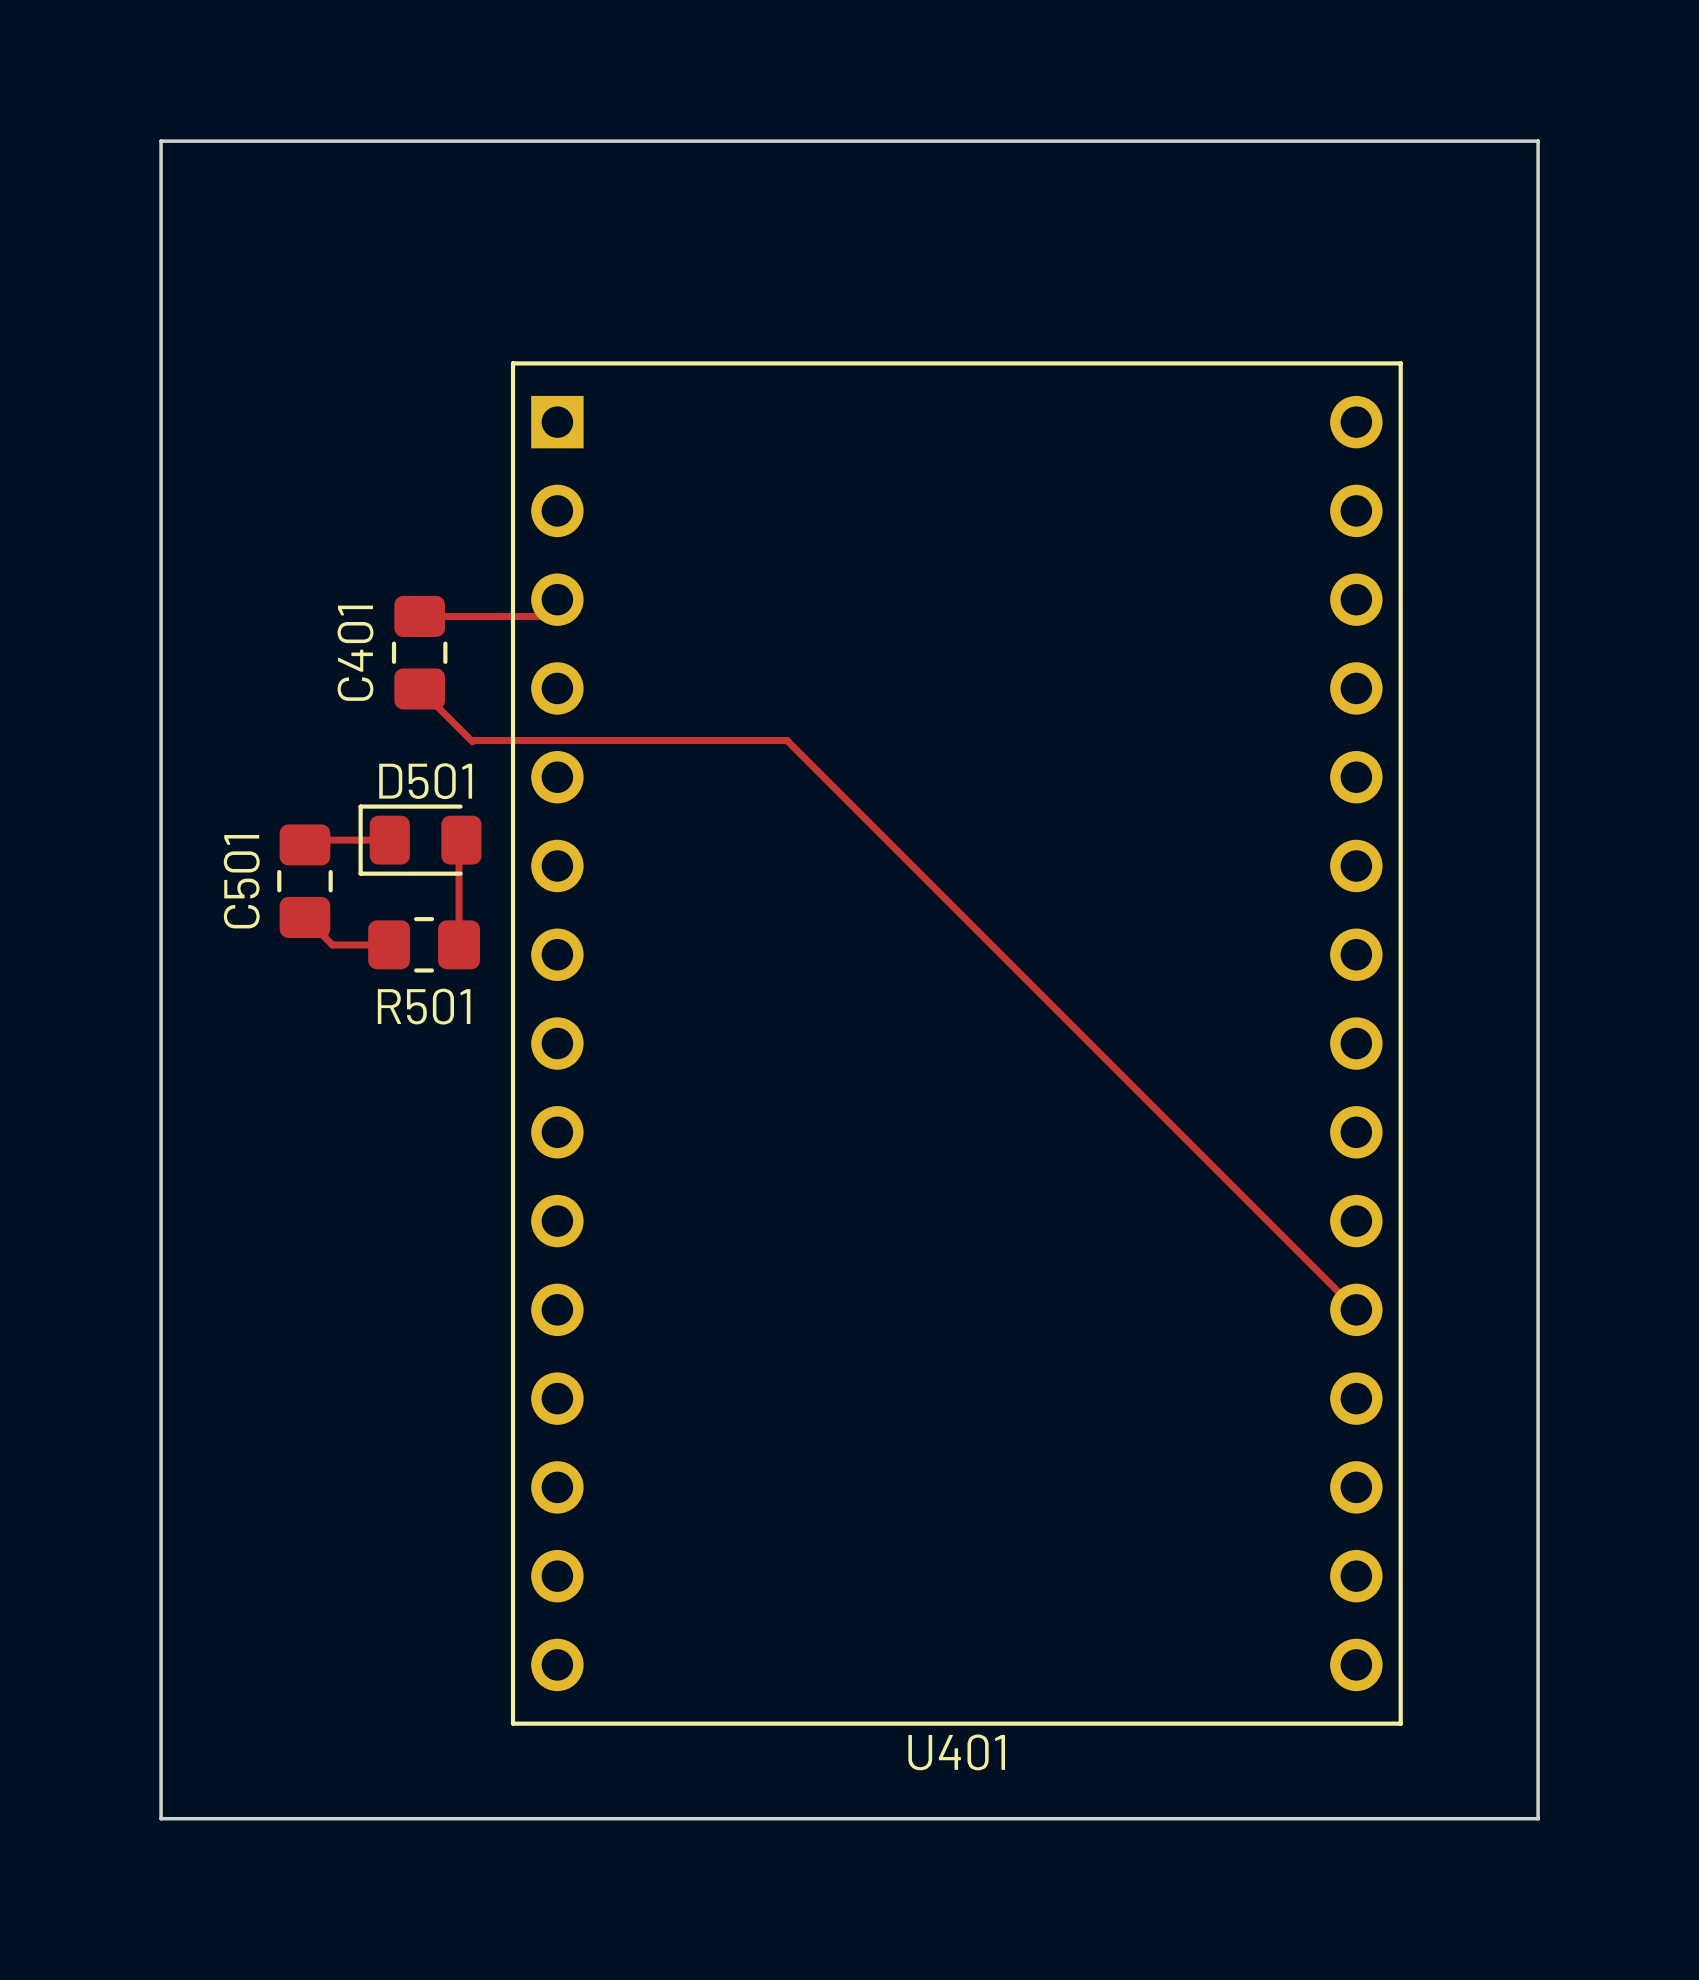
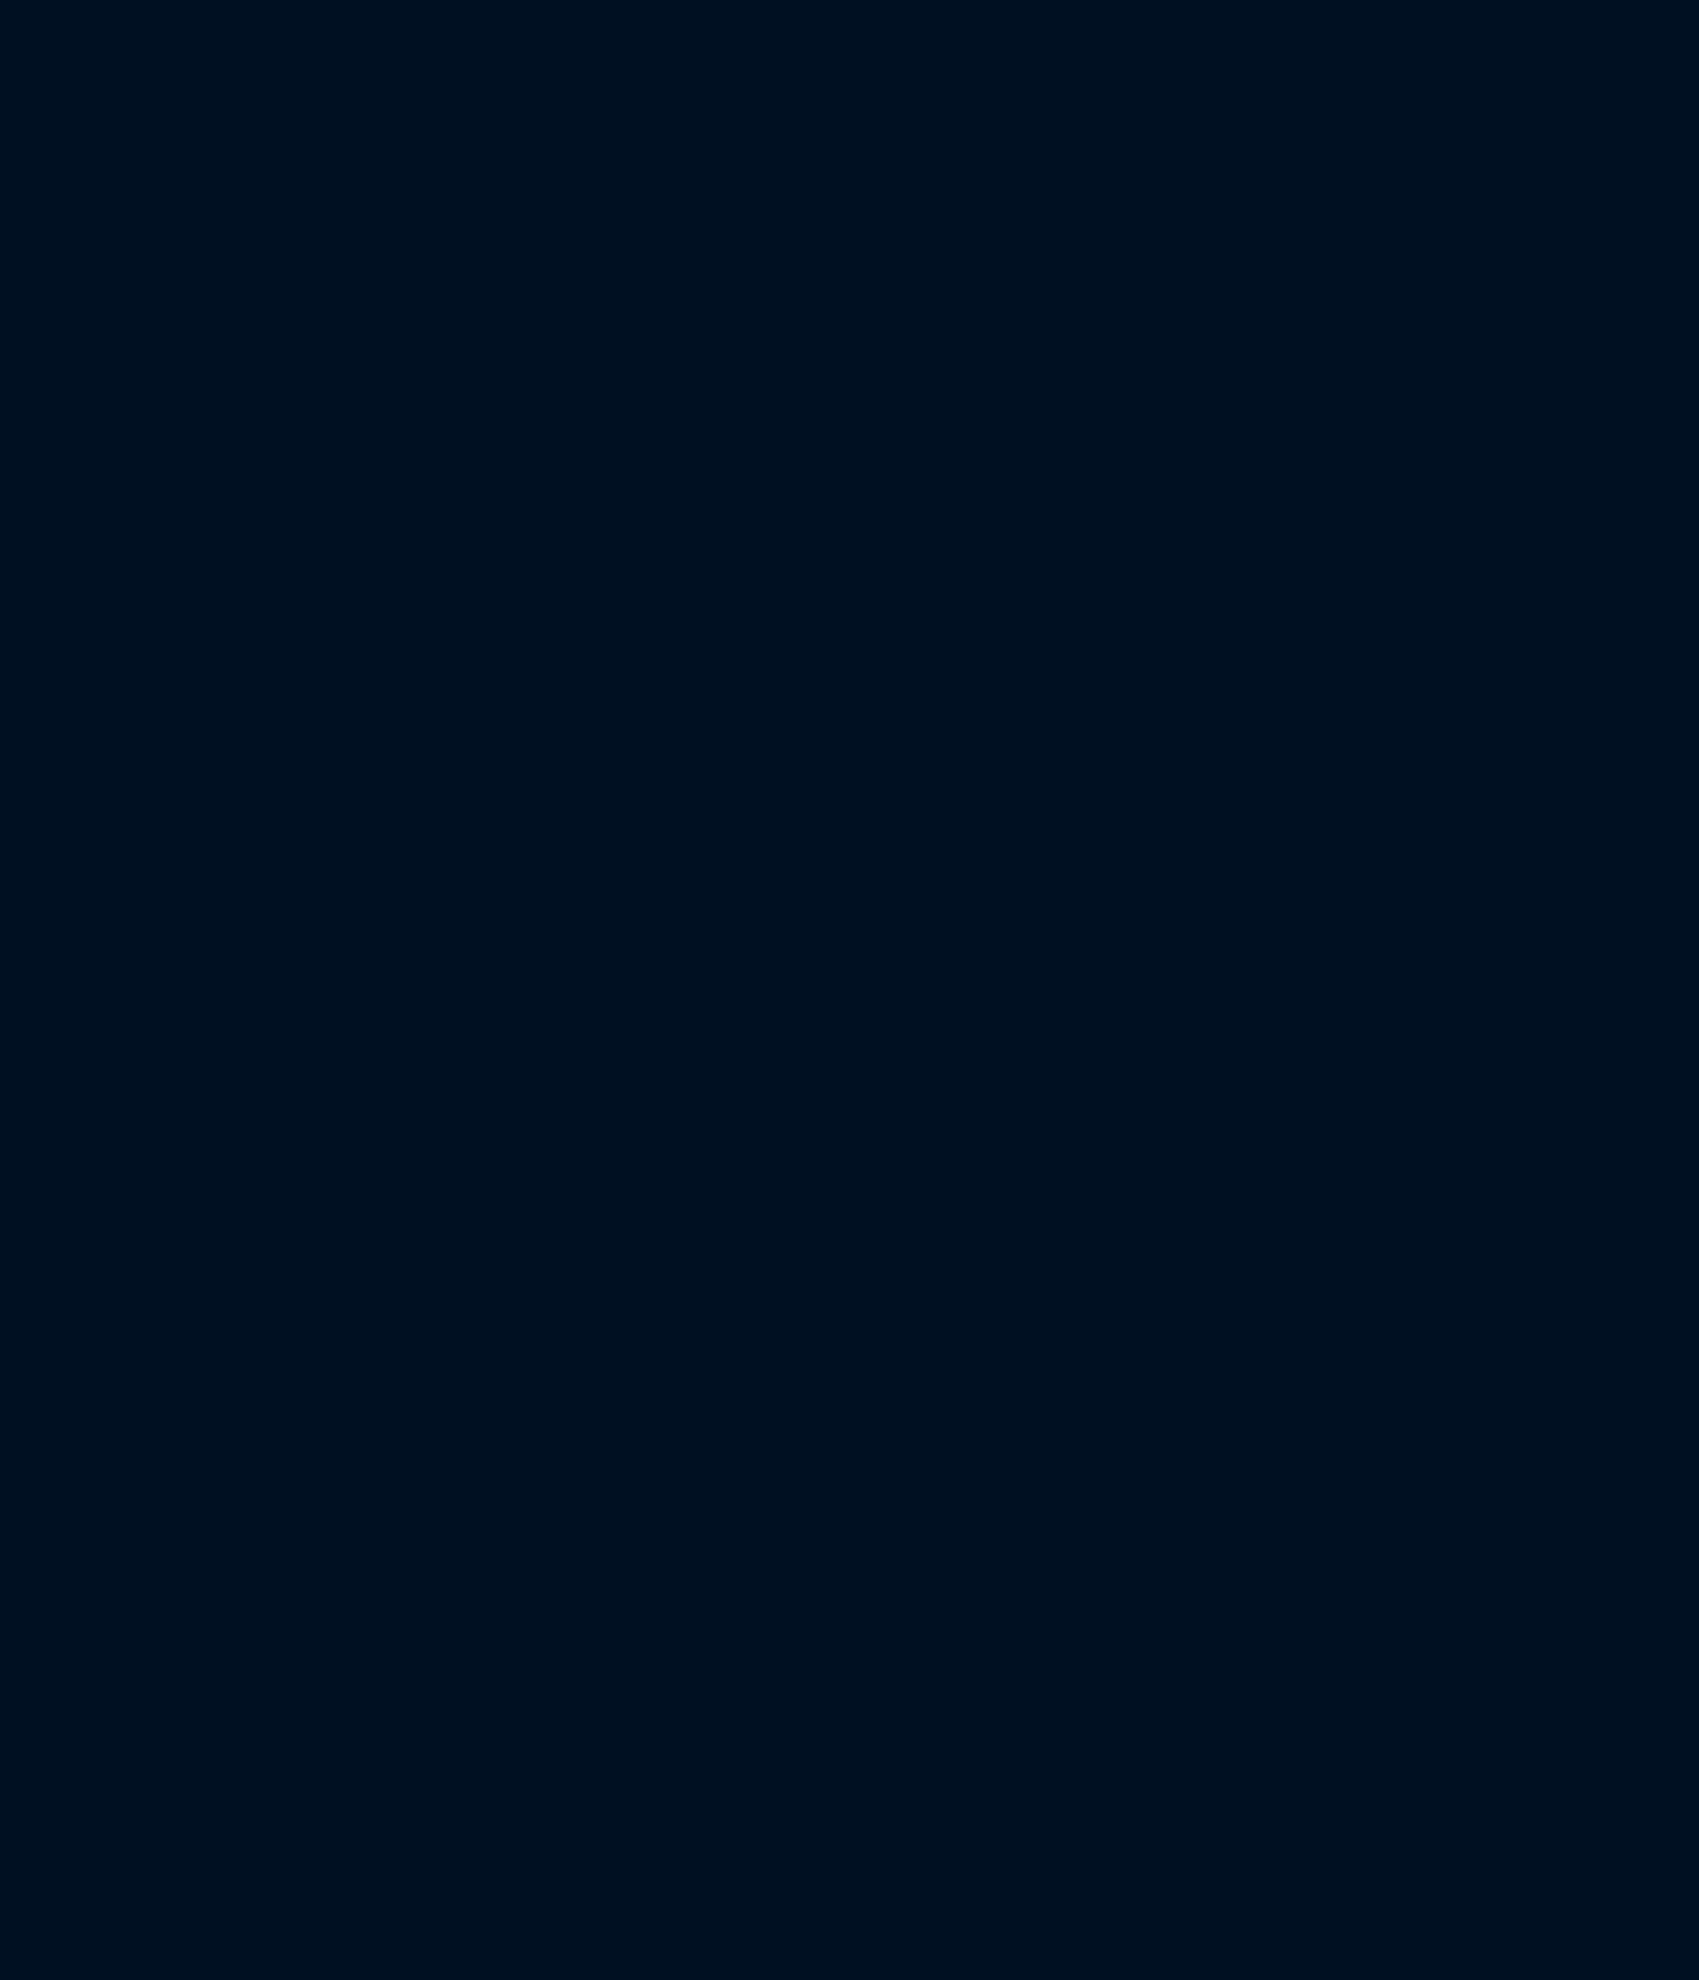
board edge: (161, 141) (1538, 141) (1538, 1818) (161, 1818) (161, 141) -> none
track: (419, 616) (541, 616) -> none
C401: (419, 652) -> none
track: (419, 688) (472, 741) -> none
track: (472, 740) (787, 740) (1356, 1309) -> none
track: (389, 840) (309, 840) (304, 844) -> none
D501: (420, 840) -> none
track: (461, 840) (459, 842) (459, 944) -> none
C501: (304, 881) -> none
track: (304, 917) (332, 944) (388, 944) -> none
R501: (424, 944) -> none
U401: (956, 1043) -> none

